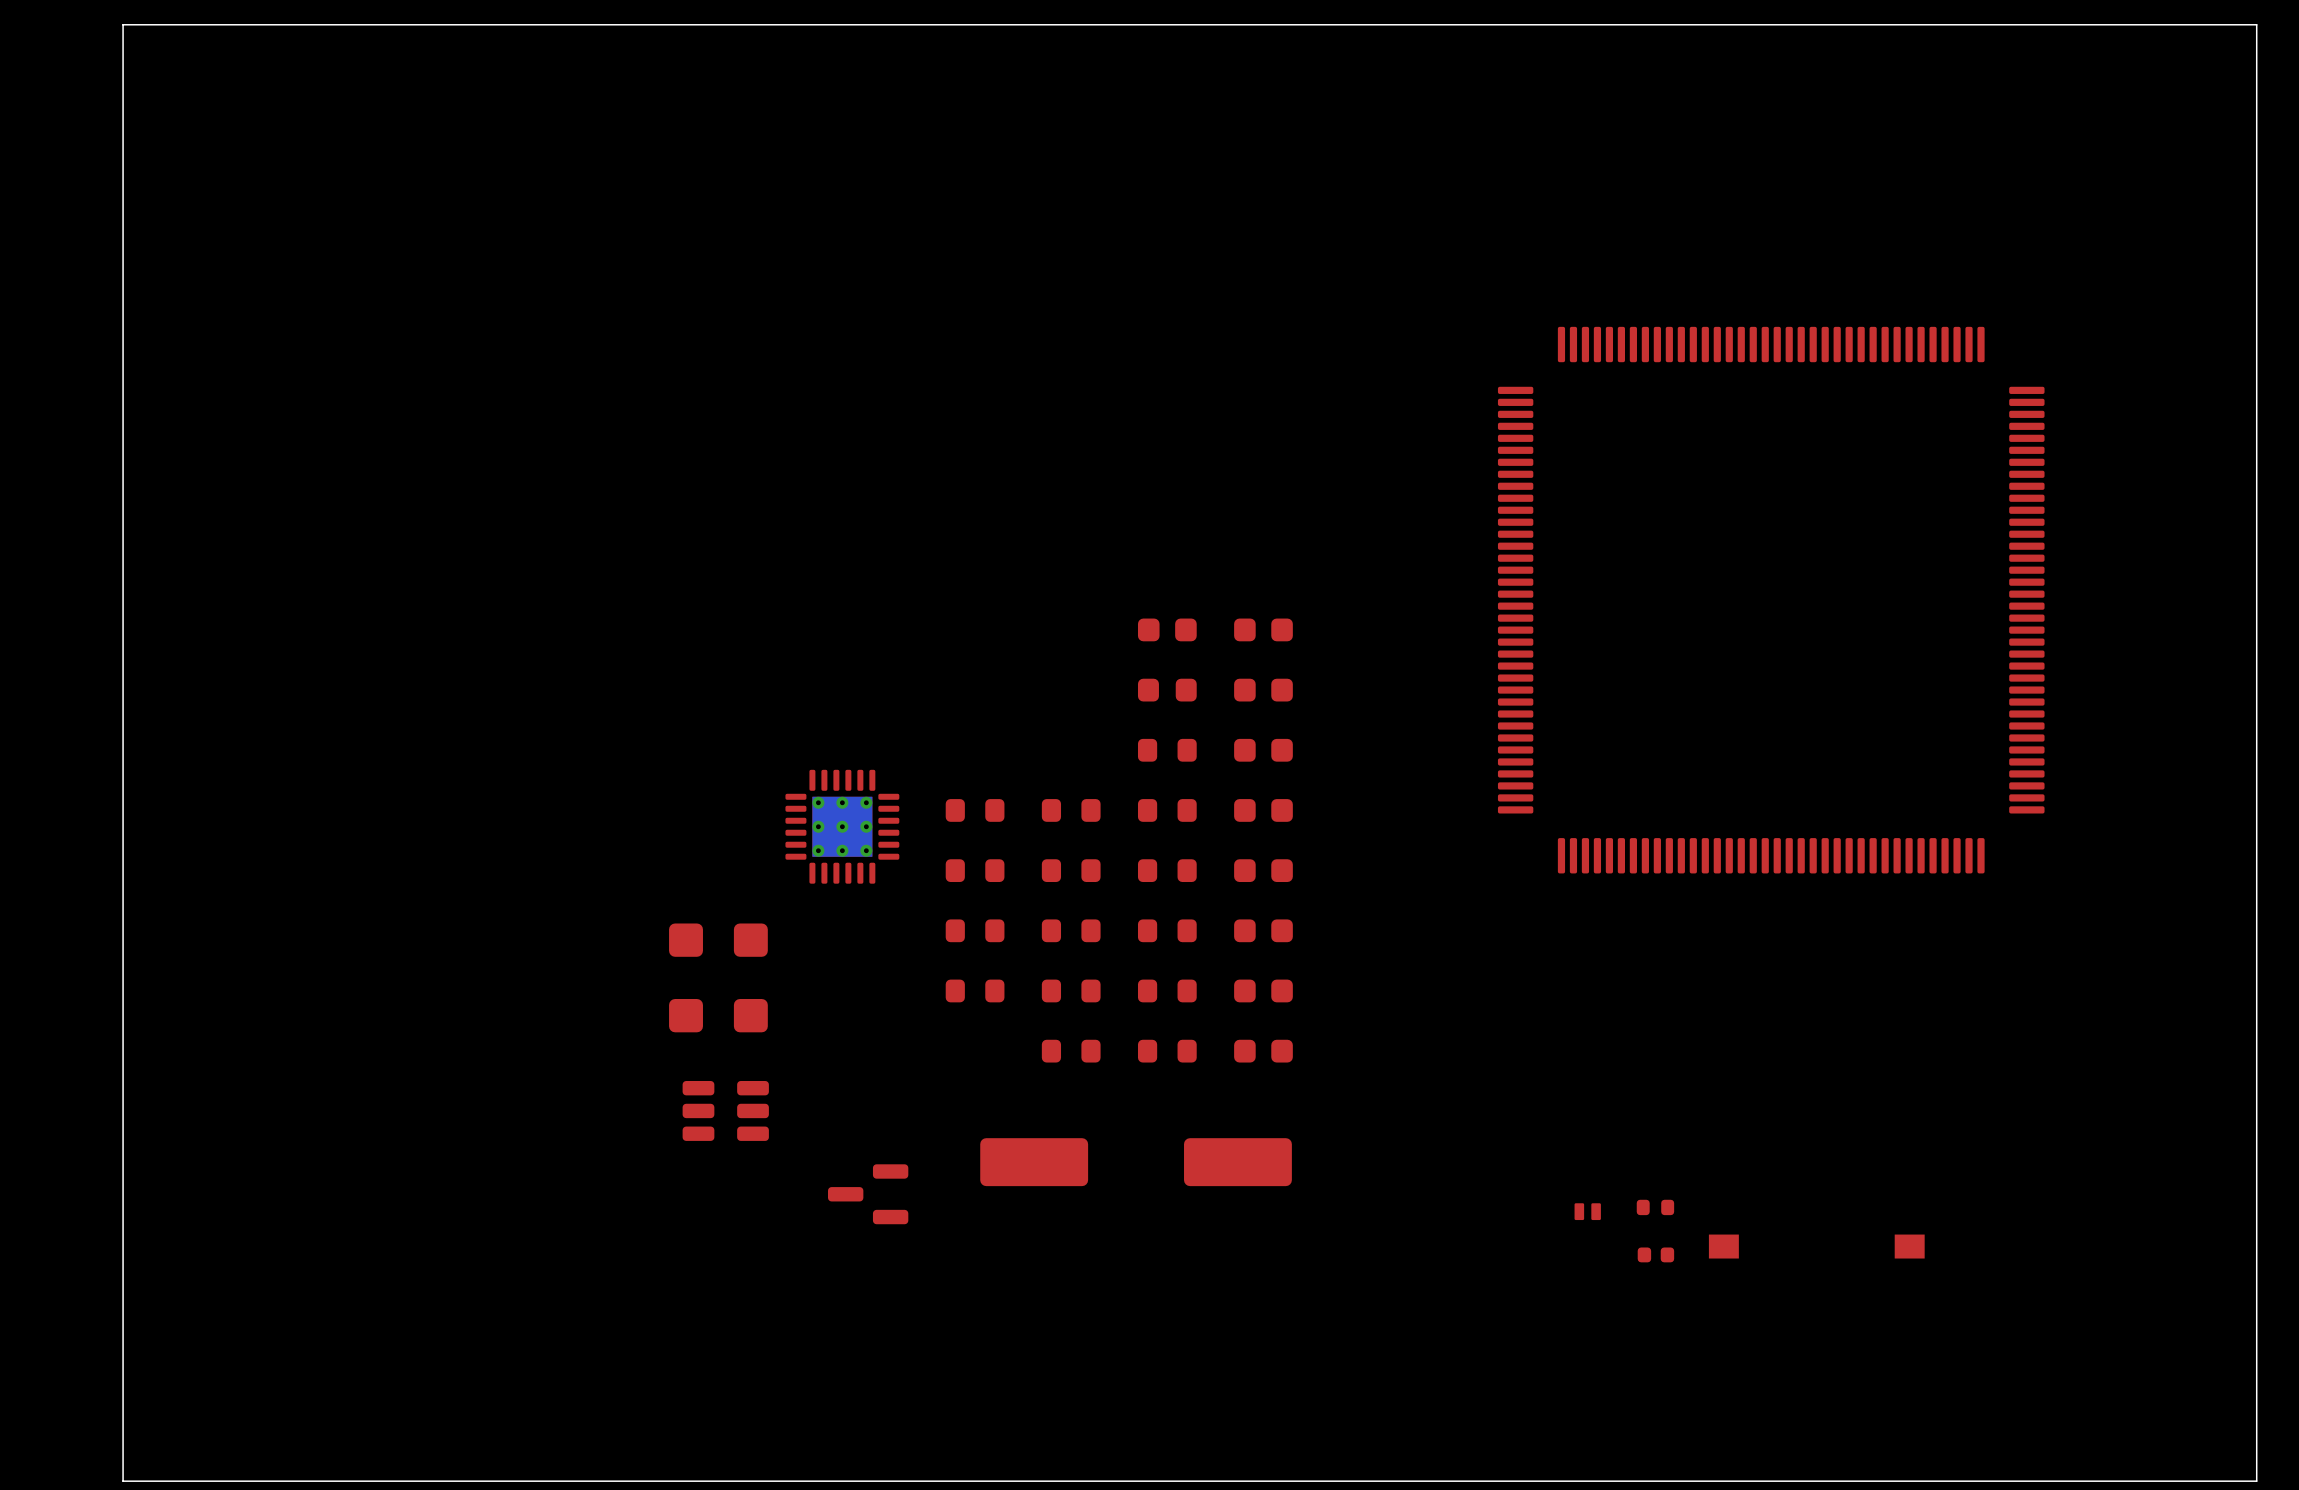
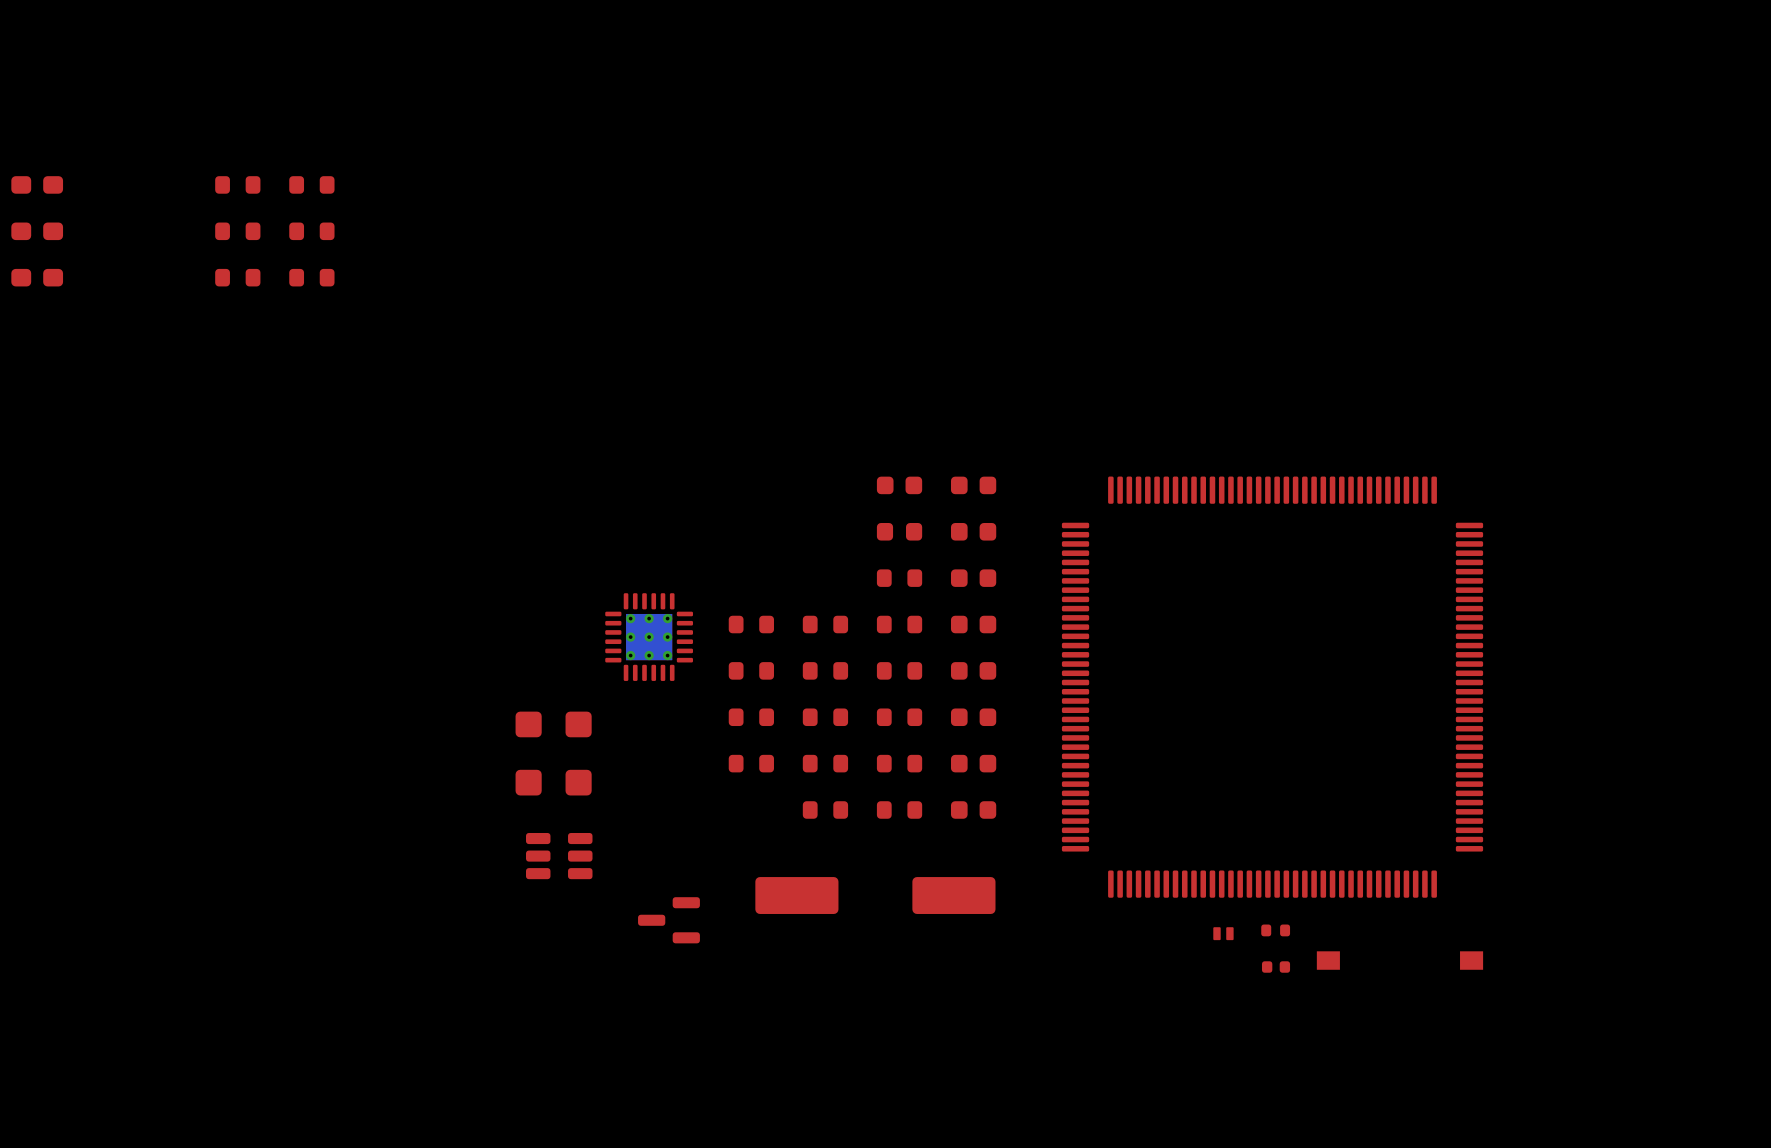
board edge: (2256, 24) (123, 24) (123, 1481) (2256, 1481) (2256, 24) -> none
part: none -> (37, 184)
part: none -> (237, 184)
part: none -> (311, 184)
part: none -> (37, 231)
part: none -> (237, 231)
part: none -> (311, 231)
part: none -> (37, 277)
part: none -> (237, 277)
part: none -> (311, 277)
part position: (1771, 600) -> (1272, 687)

